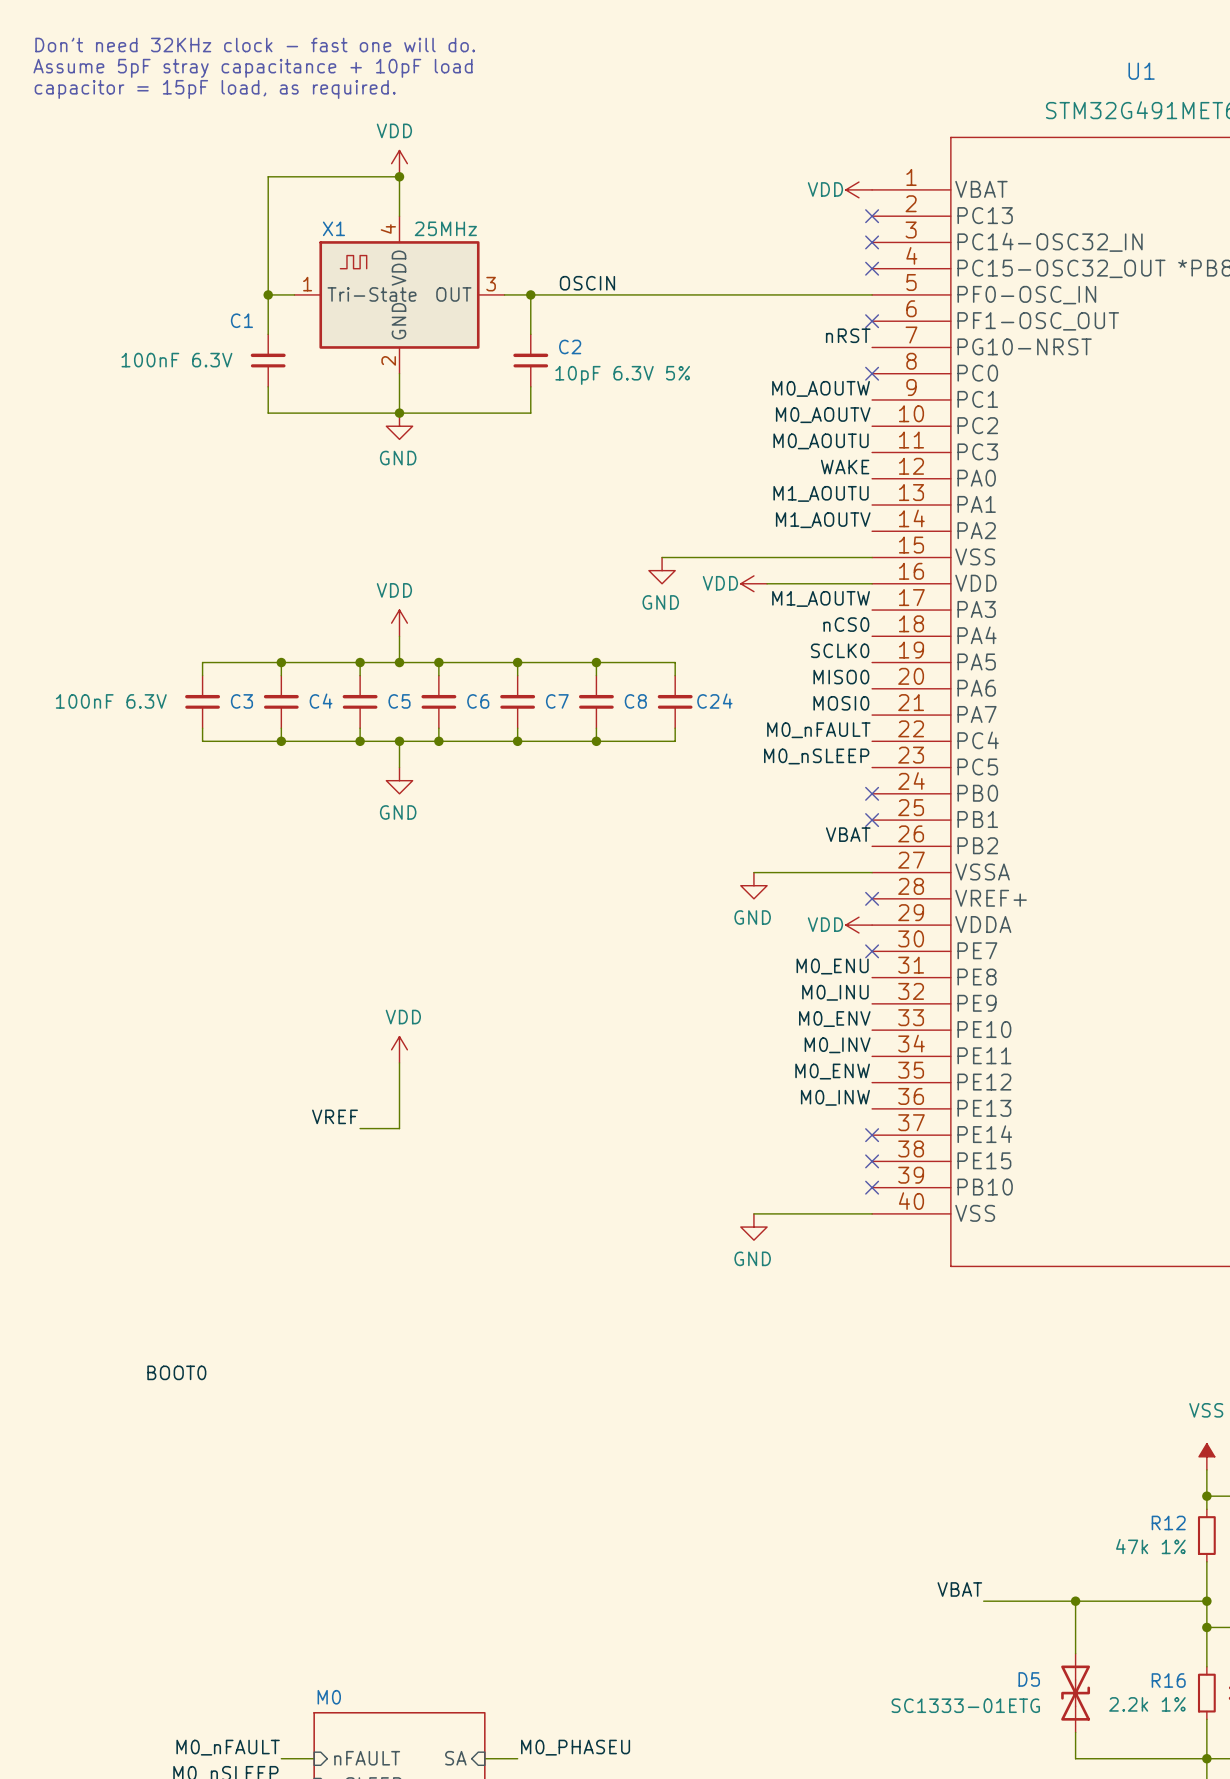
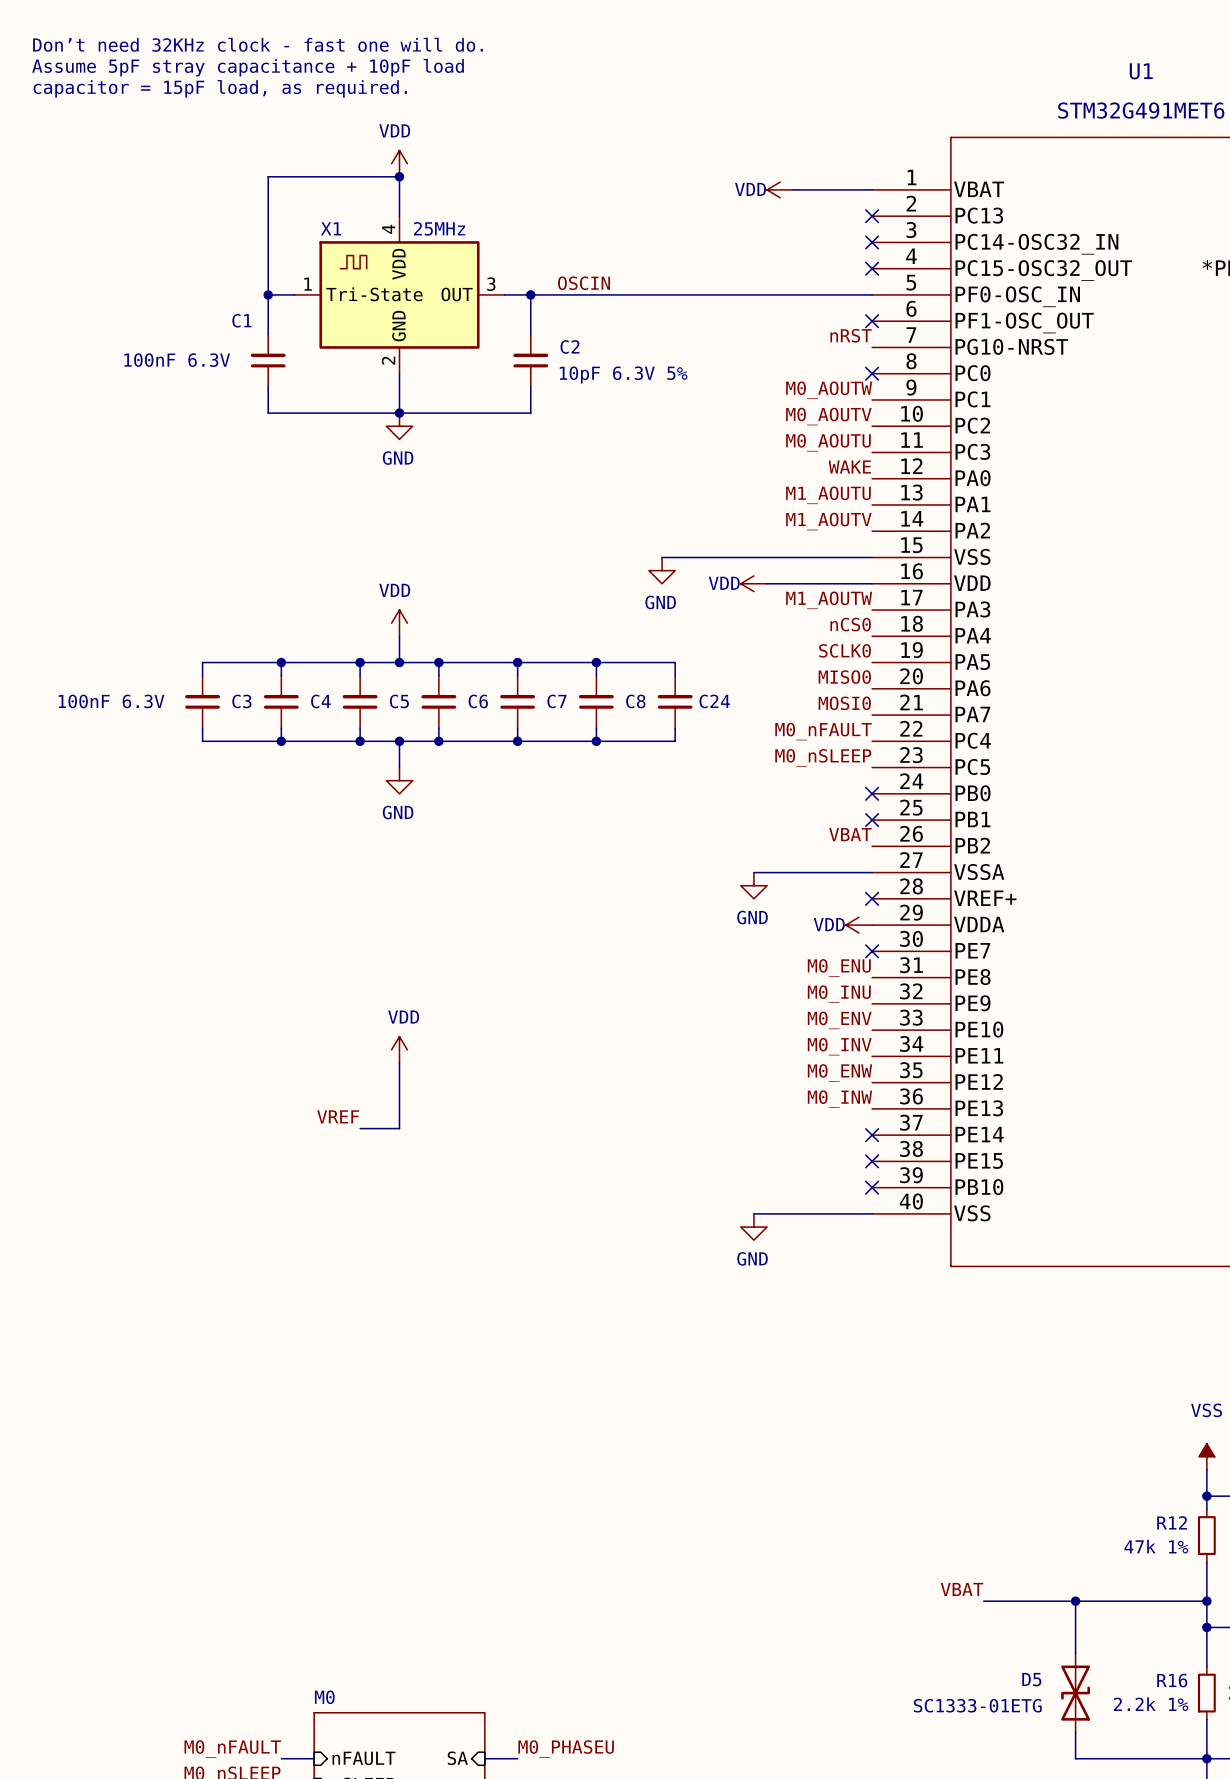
wire: none -> (793, 189) (872, 189)
power symbol position: VDD (858, 189) -> VDD (780, 189)
label: BOOT0 (176, 1372) -> none

